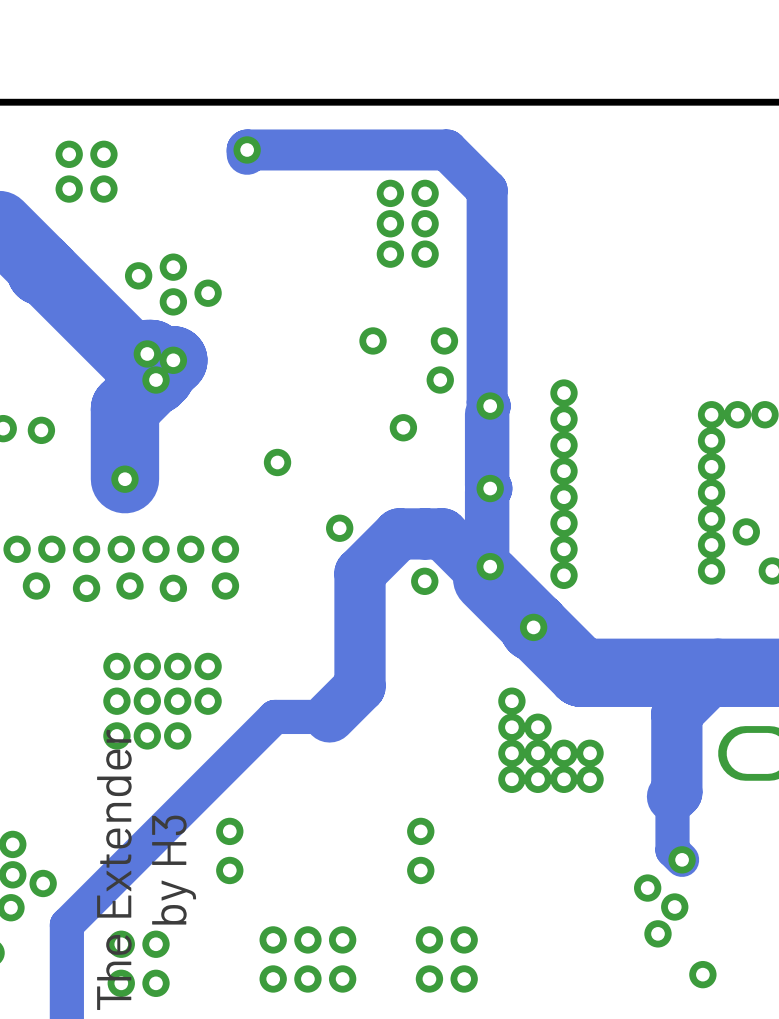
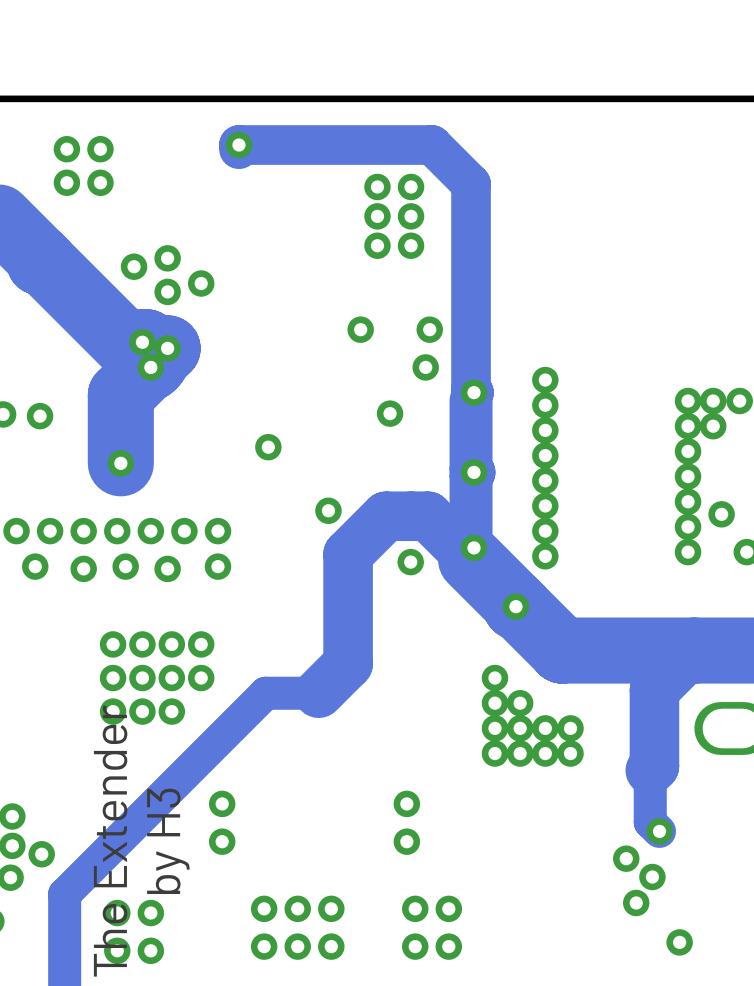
via: none -> (713, 426)

